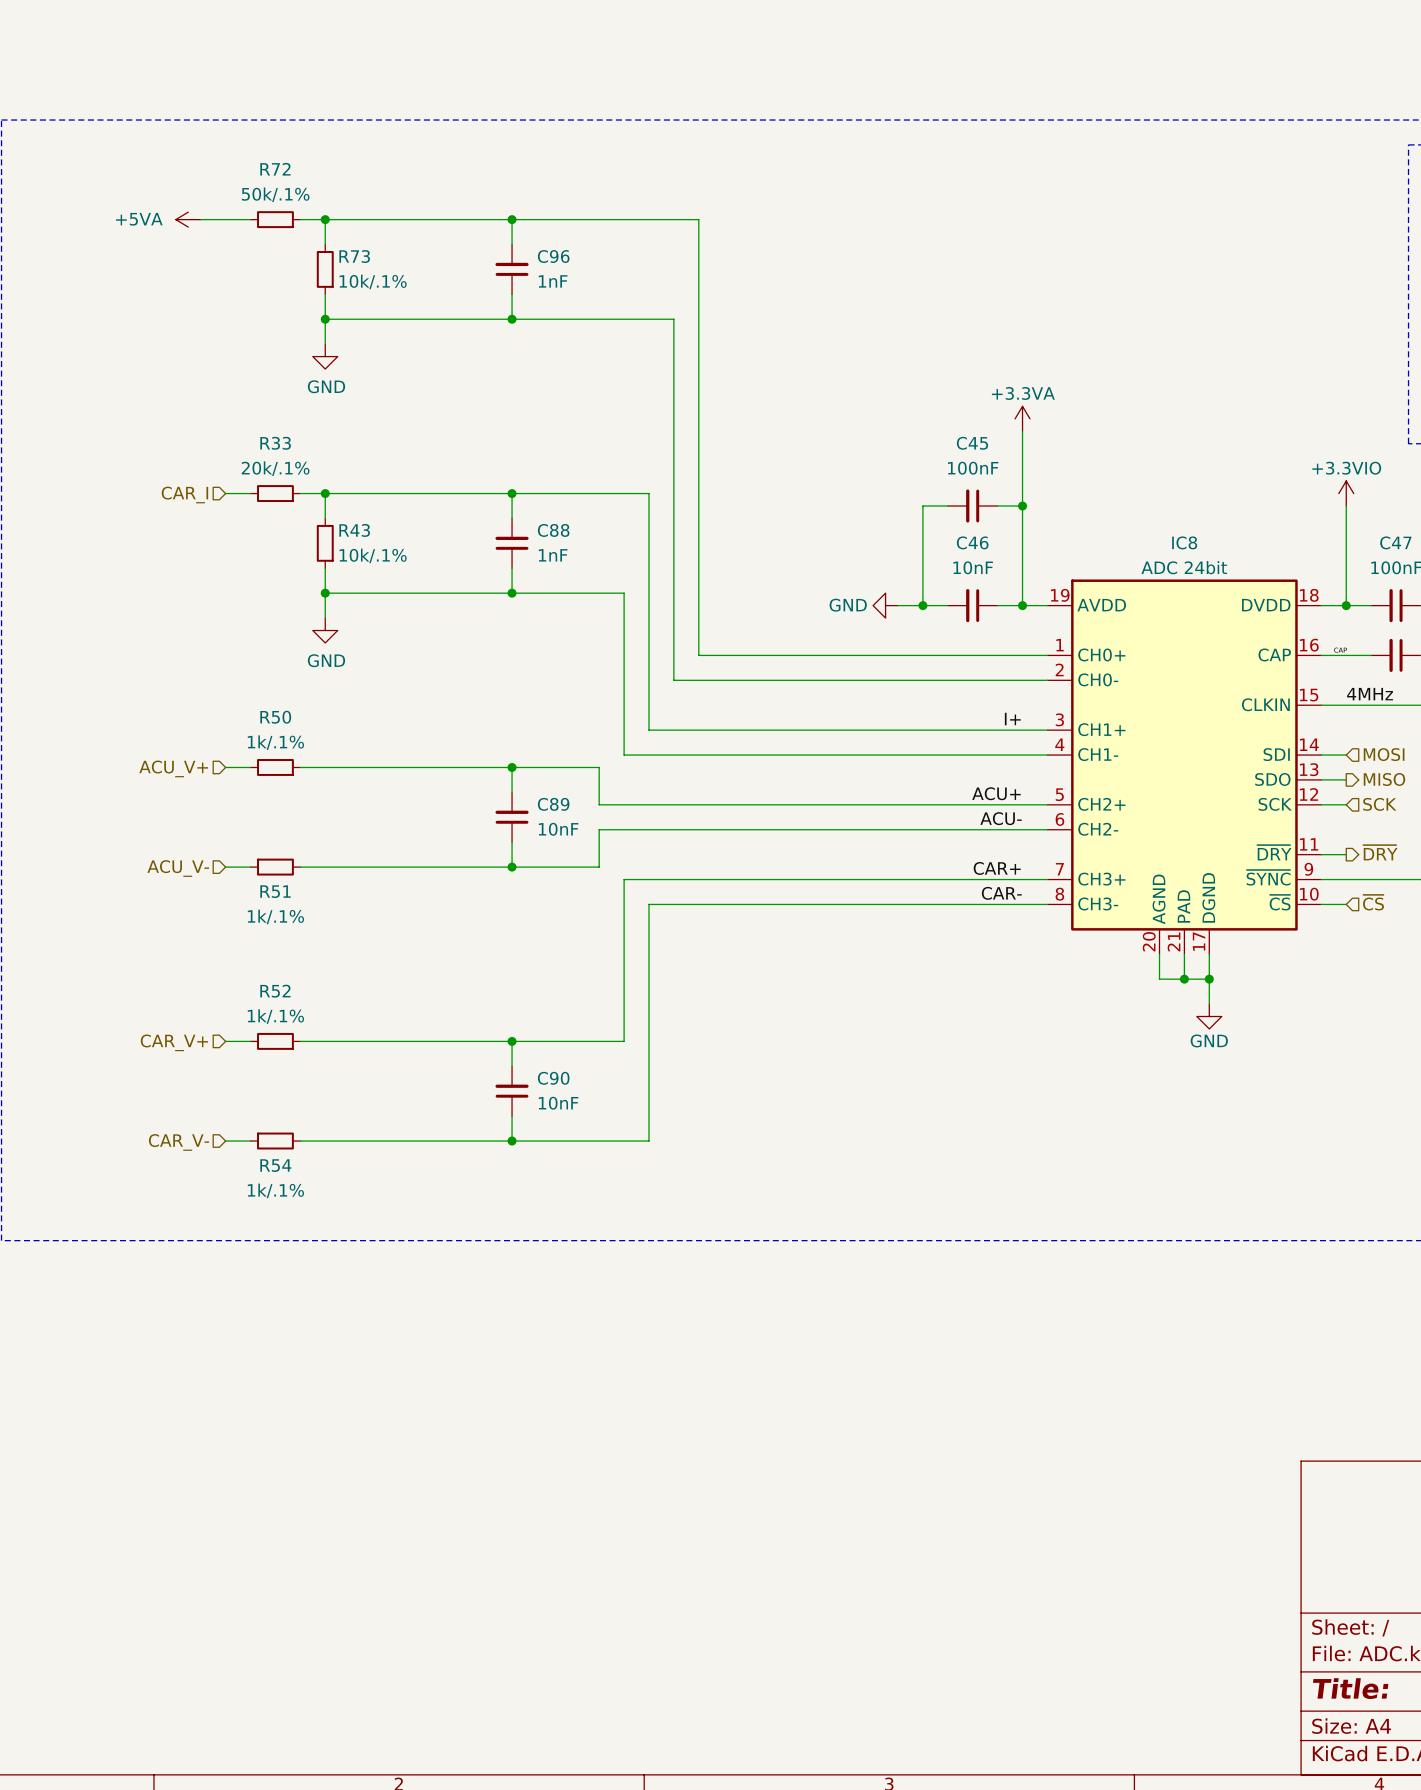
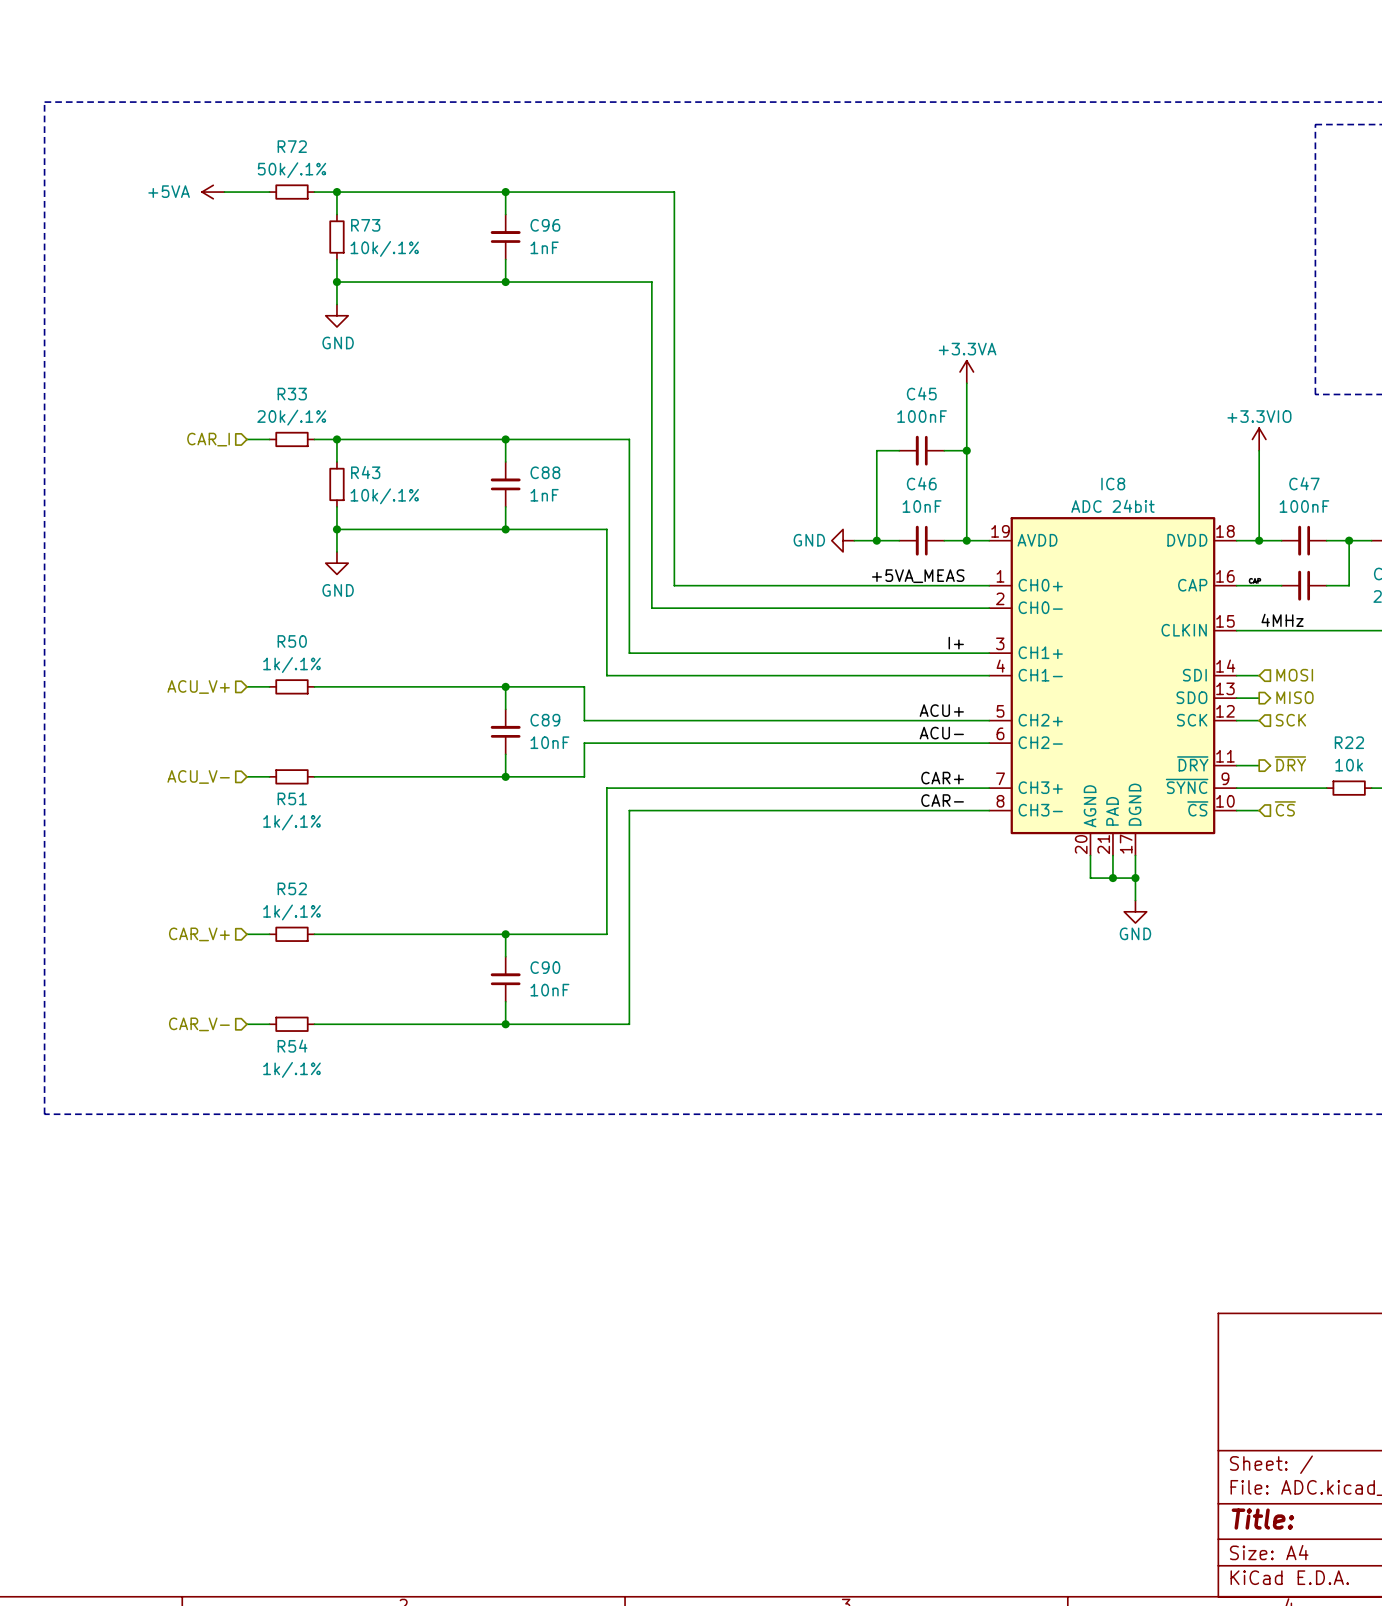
label: none -> +5VA_MEAS (918, 576)

